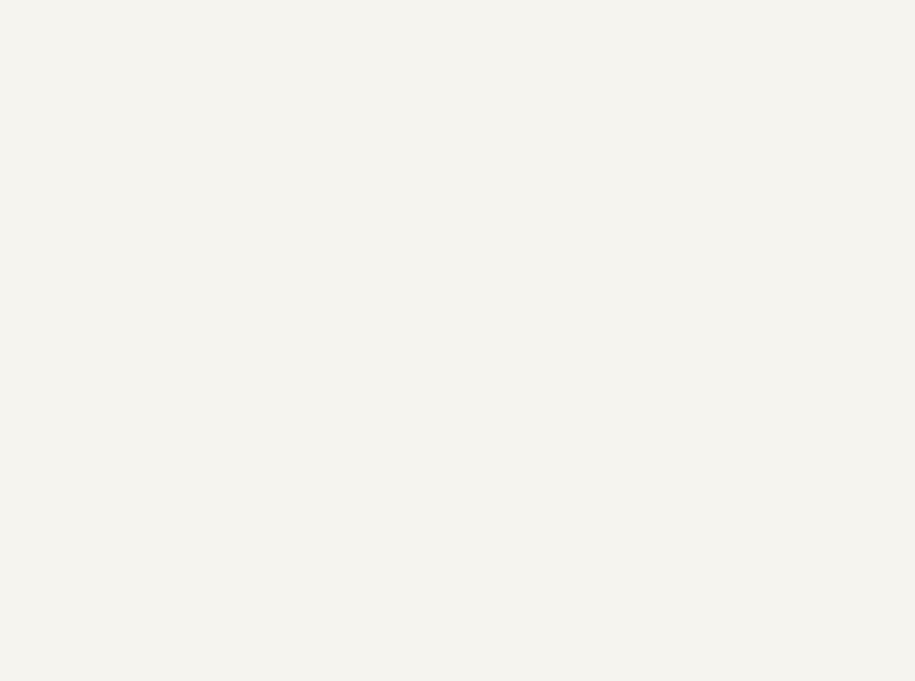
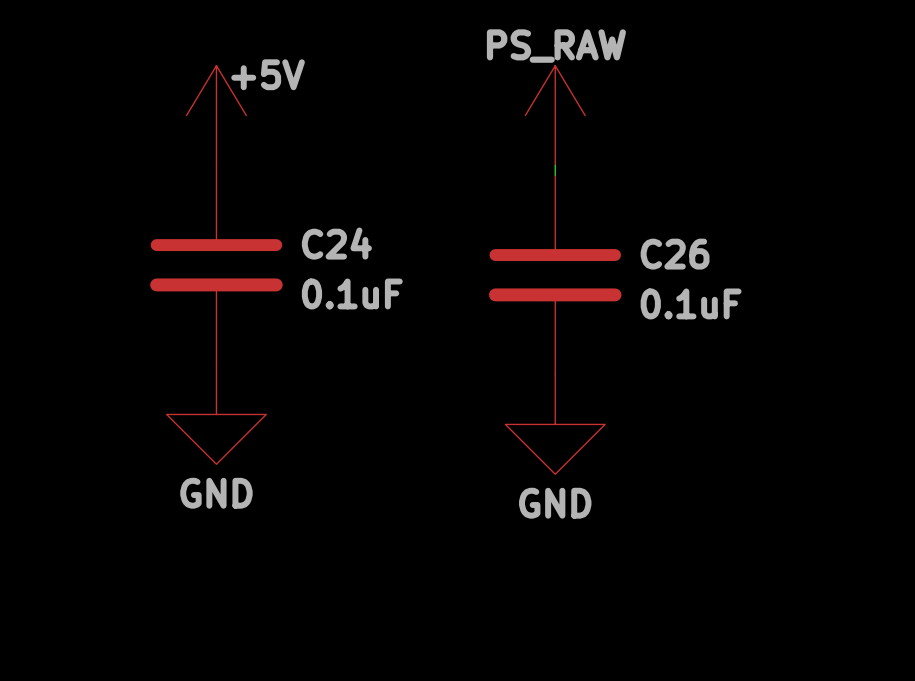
power symbol: none -> +5V (216, 115)
power symbol: none -> PS_RAW (555, 115)
wire: none -> (555, 165) (555, 175)
C24: none -> 0.1uF (216, 265)
C26: none -> 0.1uF (555, 274)
power symbol: none -> GND (216, 414)
power symbol: none -> GND (555, 424)

